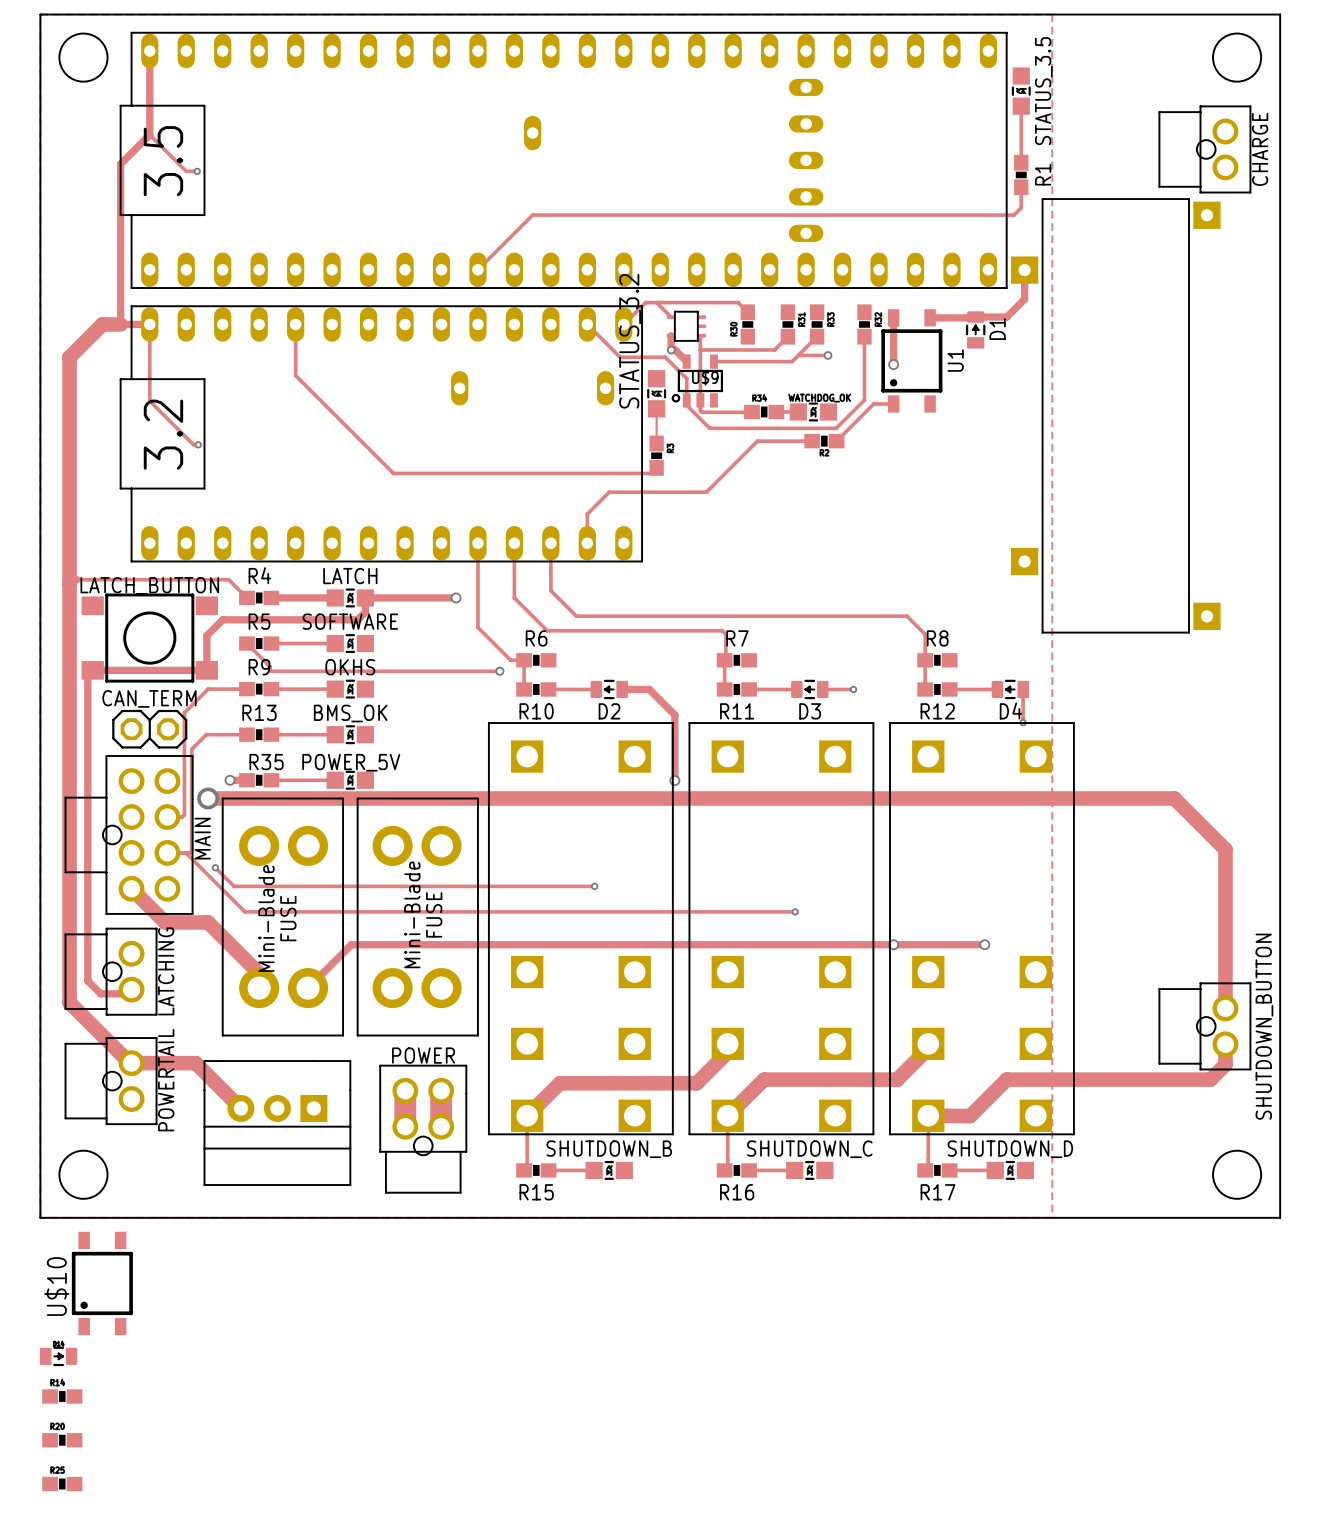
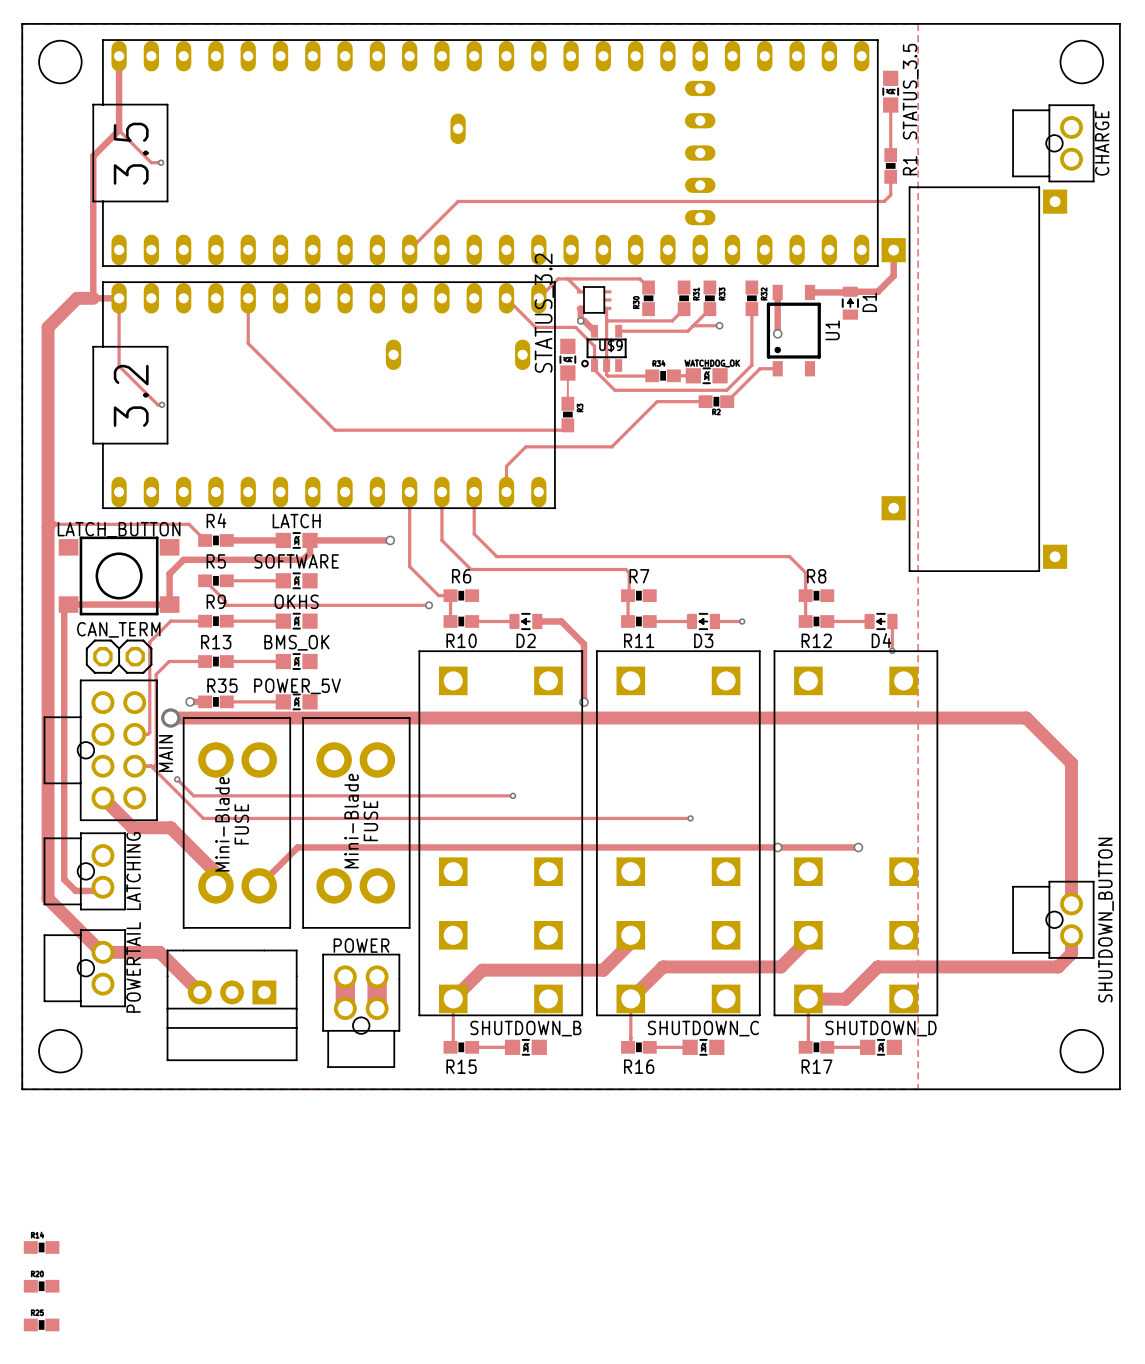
U$10: (102, 1283) -> none
part: (58, 1356) -> none

